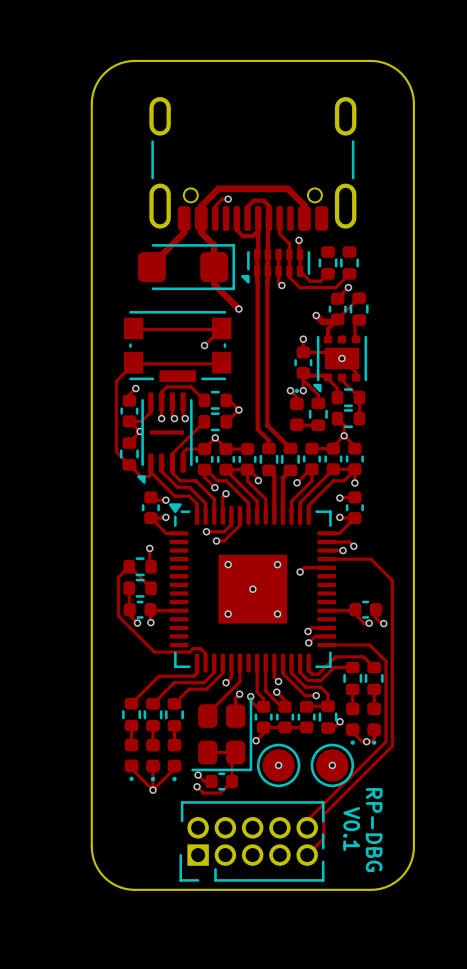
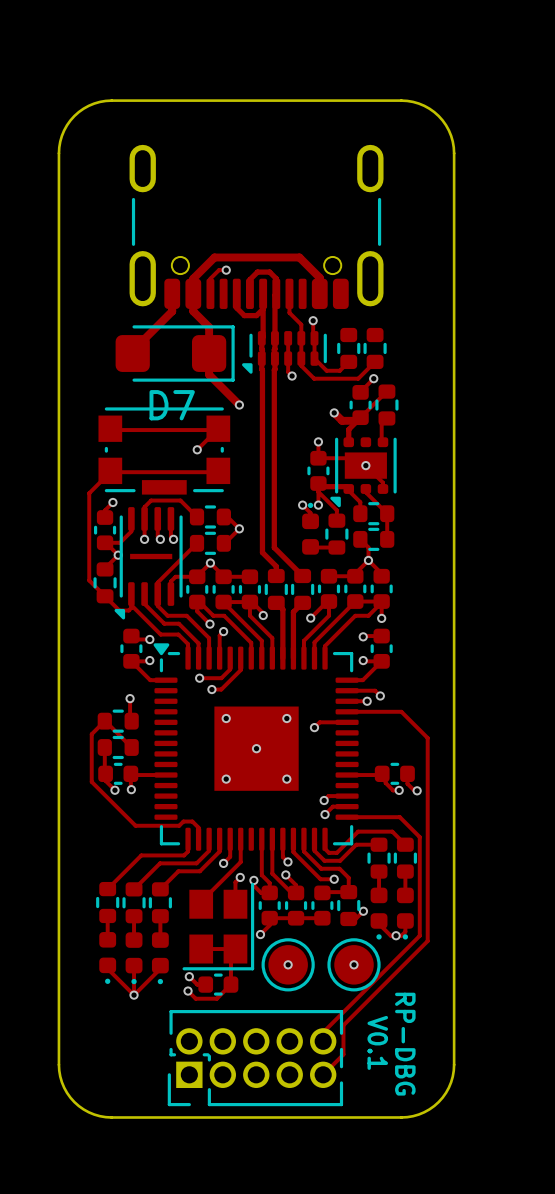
D7 name: none -> D7 (172, 405)
part footprint: [191, 697, 253, 772] -> [182, 882, 255, 971]
part footprint: [179, 801, 325, 882] -> [167, 1010, 344, 1107]

